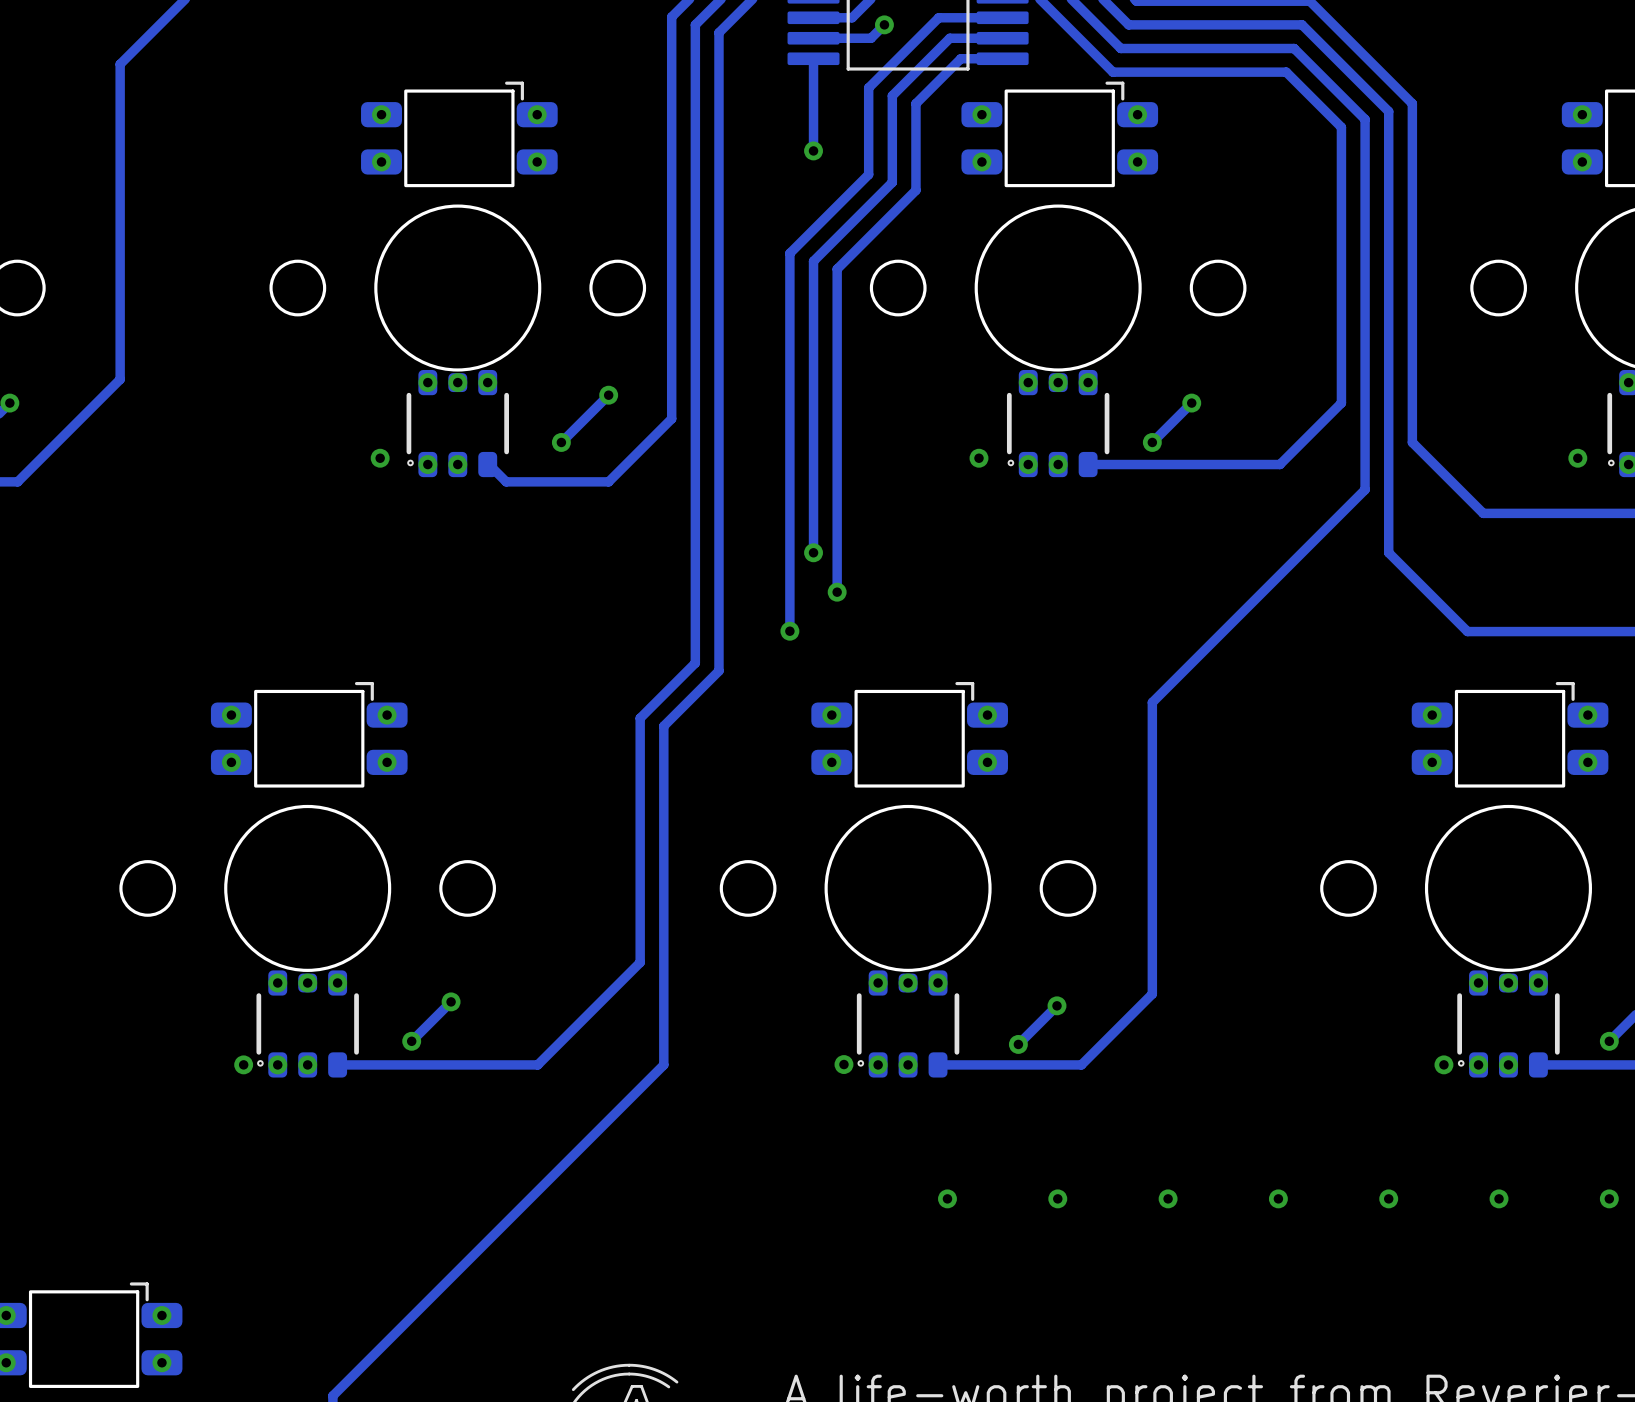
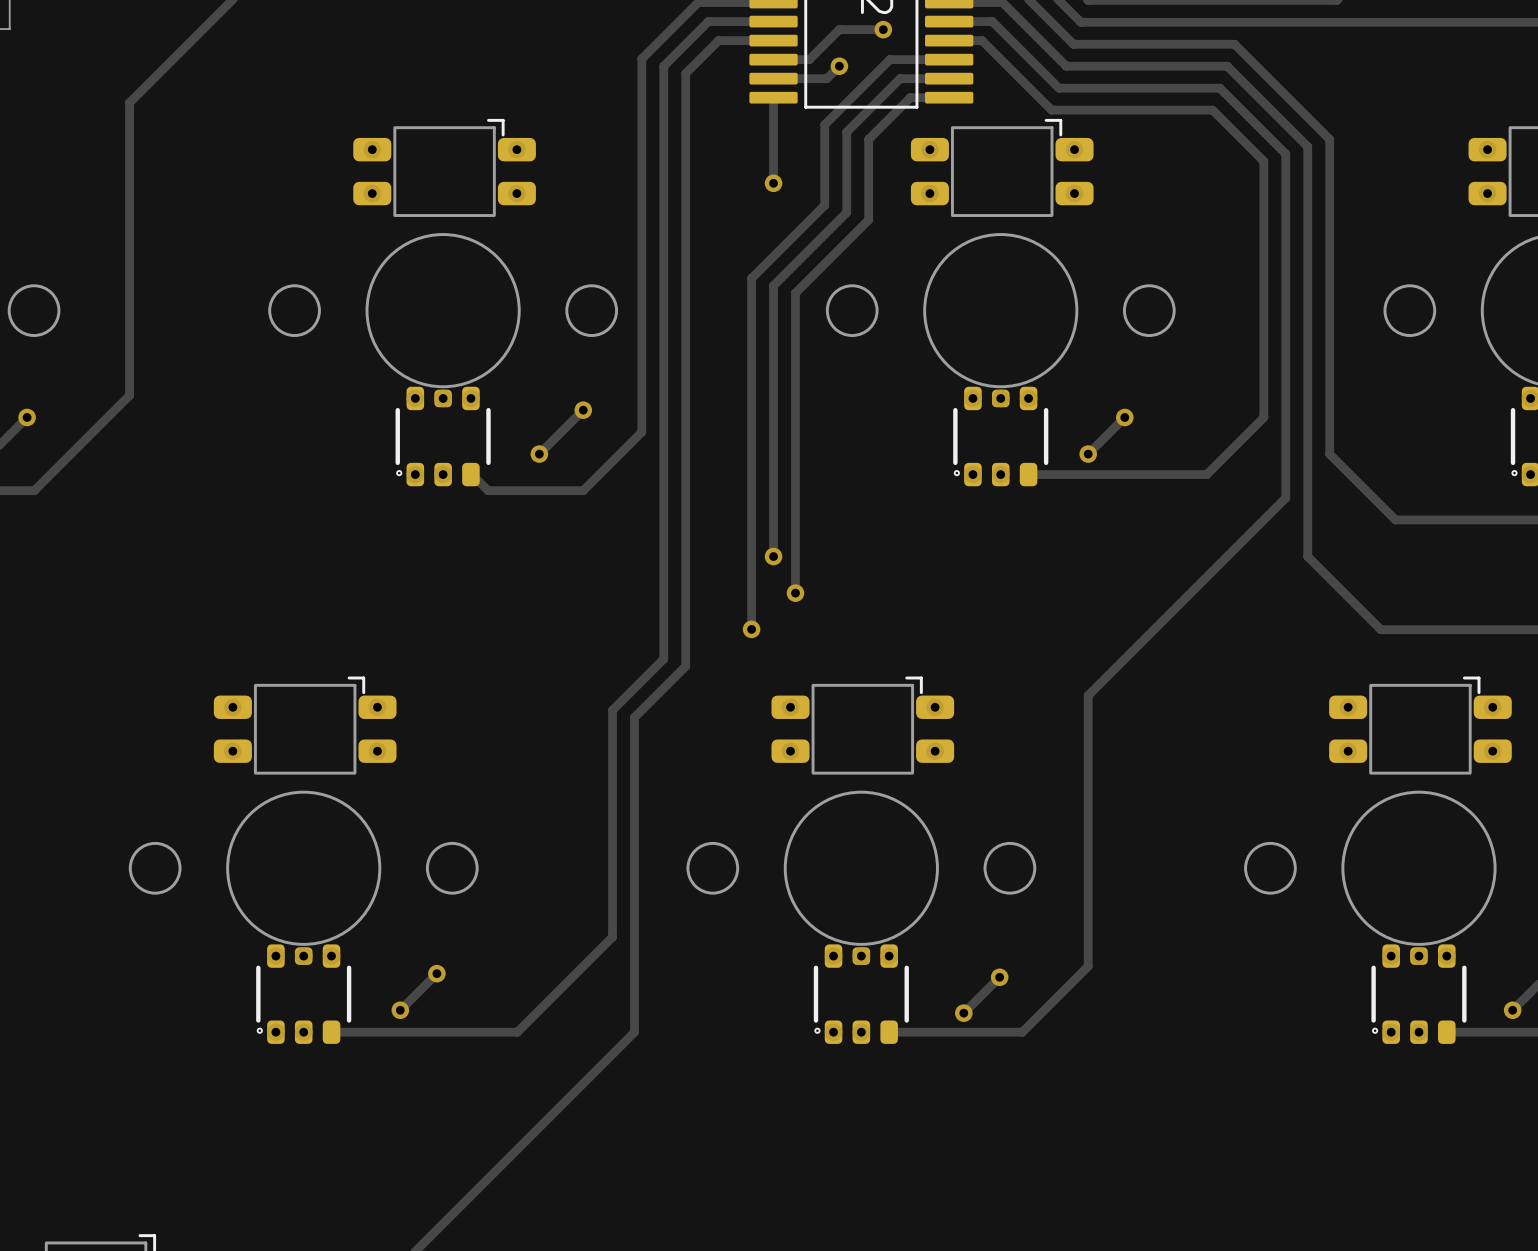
via: (380, 458) -> none
via: (978, 458) -> none
via: (1577, 458) -> none
via: (243, 1064) -> none
via: (843, 1064) -> none
via: (1443, 1064) -> none
via: (947, 1198) -> none
via: (1057, 1198) -> none
via: (1168, 1198) -> none
via: (1278, 1198) -> none
via: (1388, 1198) -> none
via: (1499, 1198) -> none
via: (1609, 1198) -> none

